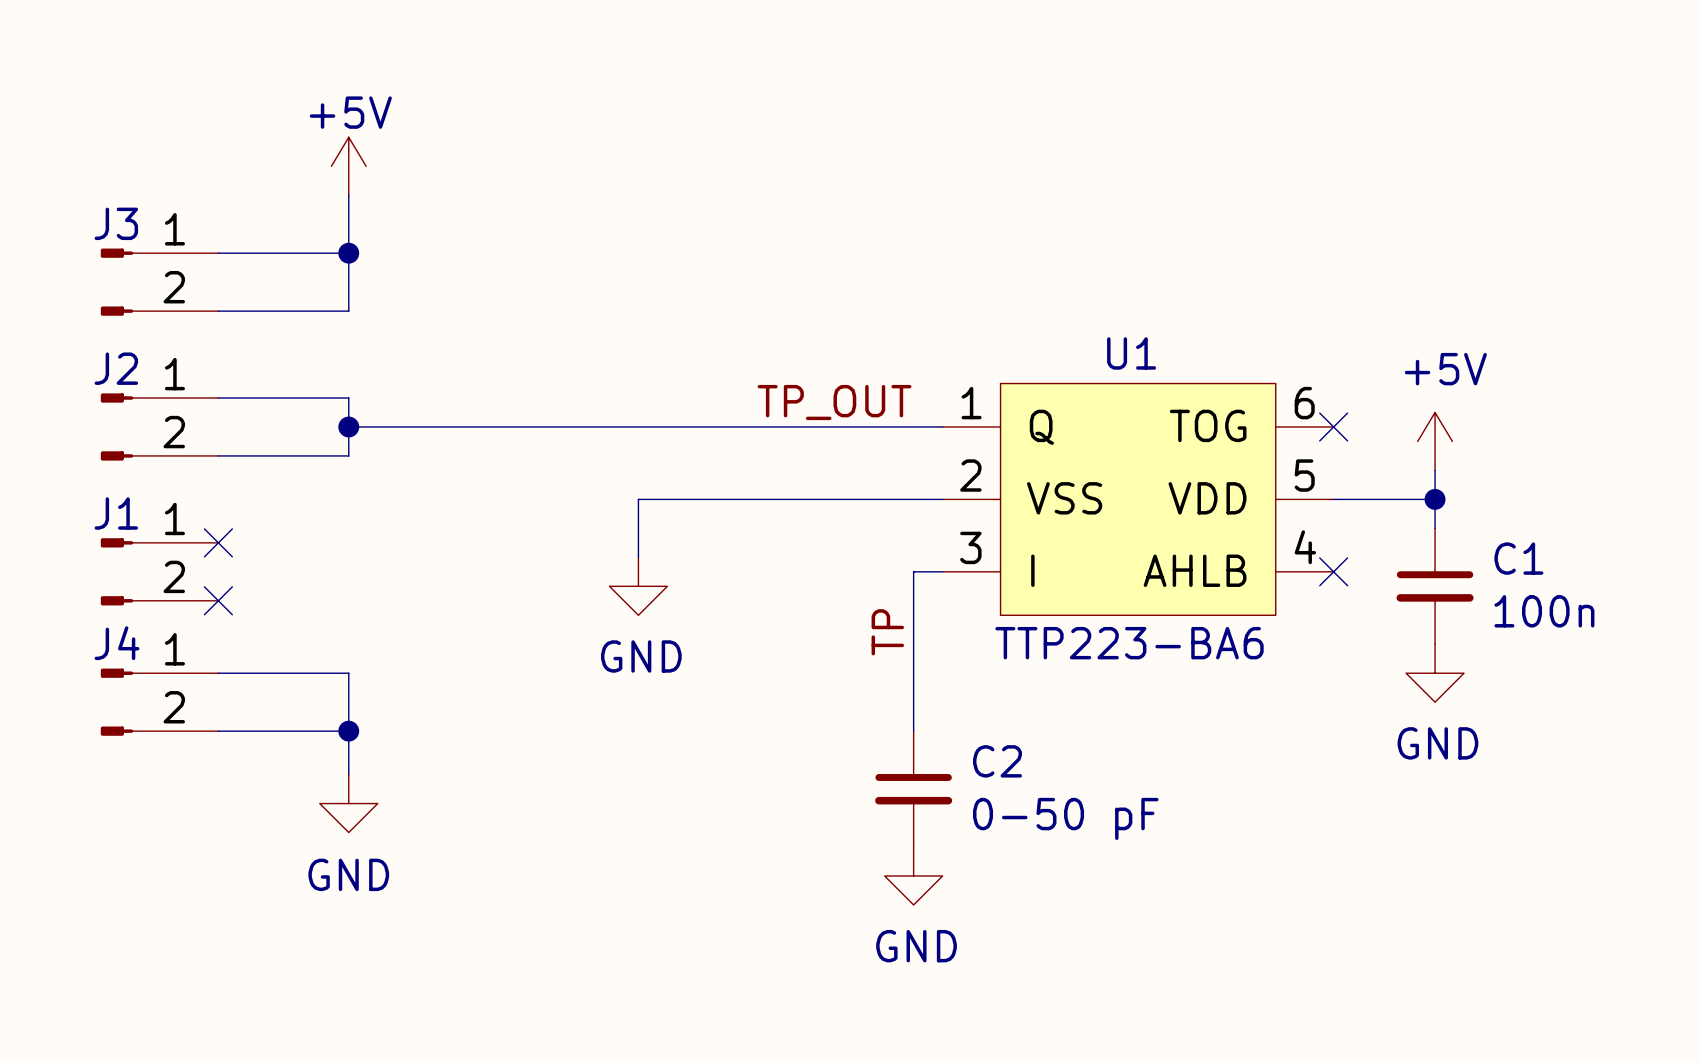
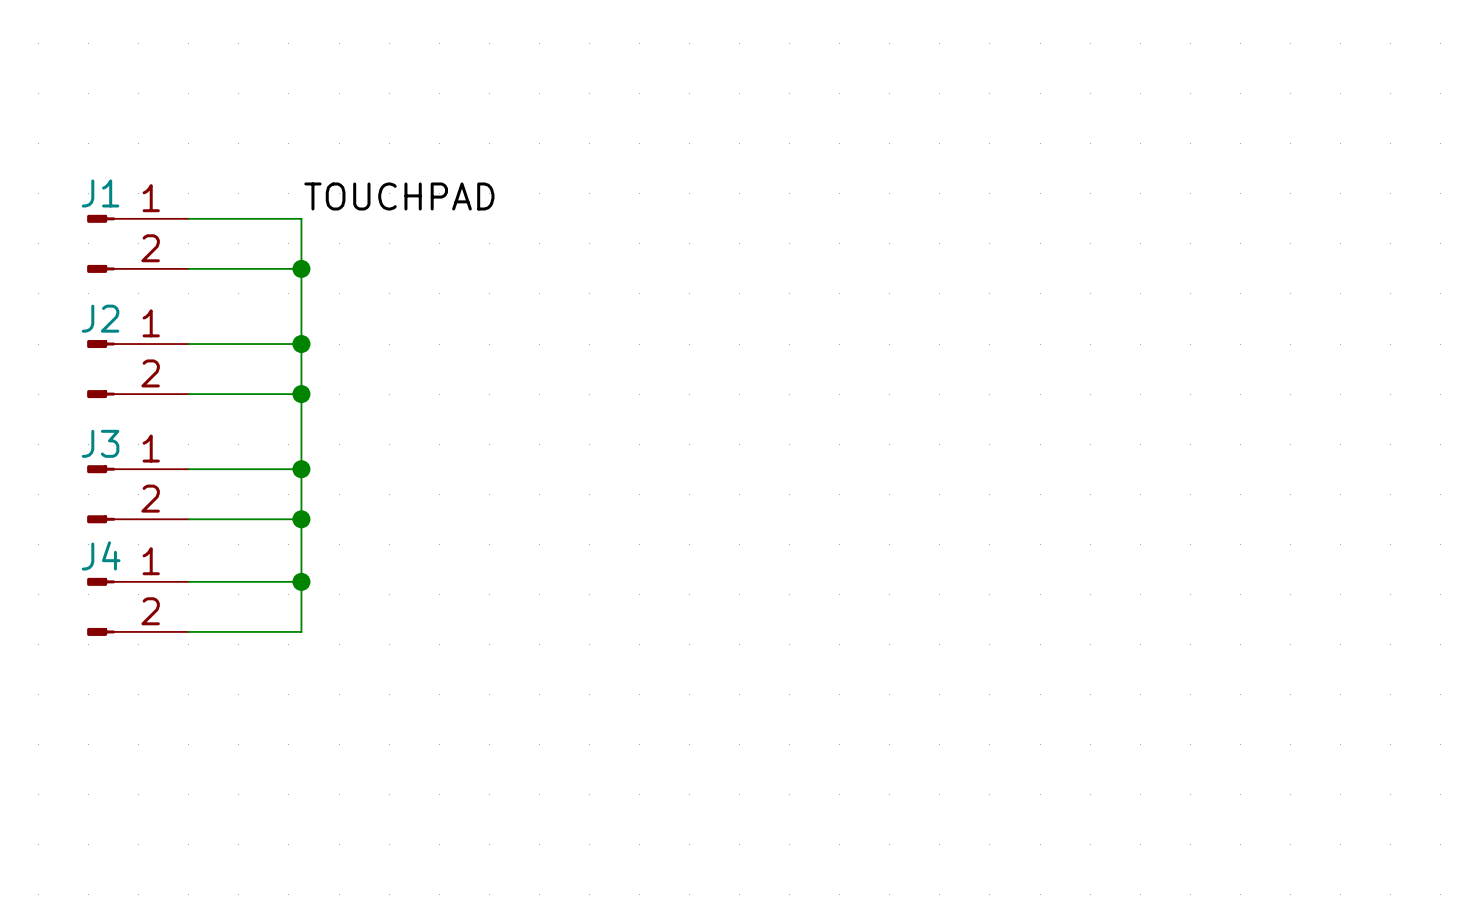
power symbol: +5V (348, 166) -> none
wire: (348, 195) (348, 253) -> none
J3 name: J3 (116, 223) -> J1 (100, 193)
label: none -> TOUCHPAD (399, 196)
junction: (348, 253) -> none
wire: none -> (301, 268) (301, 344)
junction: none -> (301, 268)
junction: none -> (301, 344)
label: TP_OUT (834, 402) -> none
wire: (348, 426) (942, 426) -> none
junction: (348, 426) -> none
no-connect mark: (1333, 426) -> none
power symbol: +5V (1435, 441) -> none
wire: none -> (301, 394) (301, 581)
junction: none -> (301, 394)
wire: (1435, 470) (1435, 528) -> none
wire: (942, 499) (638, 499) (638, 557) -> none
U1: TTP223-BA6 (1138, 499) -> none
wire: (1333, 499) (1435, 499) -> none
junction: (1435, 499) -> none
J1 name: J1 (116, 513) -> J3 (100, 443)
wire: none -> (188, 469) (301, 469)
no-connect mark: (218, 542) -> none
junction: none -> (301, 469)
wire: (942, 571) (913, 571) (913, 731) -> none
no-connect mark: (1333, 571) -> none
power symbol: GND (638, 586) -> none
C1: 100n (1435, 586) -> none
wire: none -> (188, 519) (301, 519)
no-connect mark: (218, 600) -> none
junction: none -> (301, 519)
label: TP (887, 632) -> none
power symbol: GND (1435, 673) -> none
wire: (348, 731) (348, 774) -> none
junction position: (348, 731) -> (301, 581)
C2: 0-50 pF (913, 789) -> none
power symbol: GND (348, 803) -> none
power symbol: GND (913, 875) -> none

